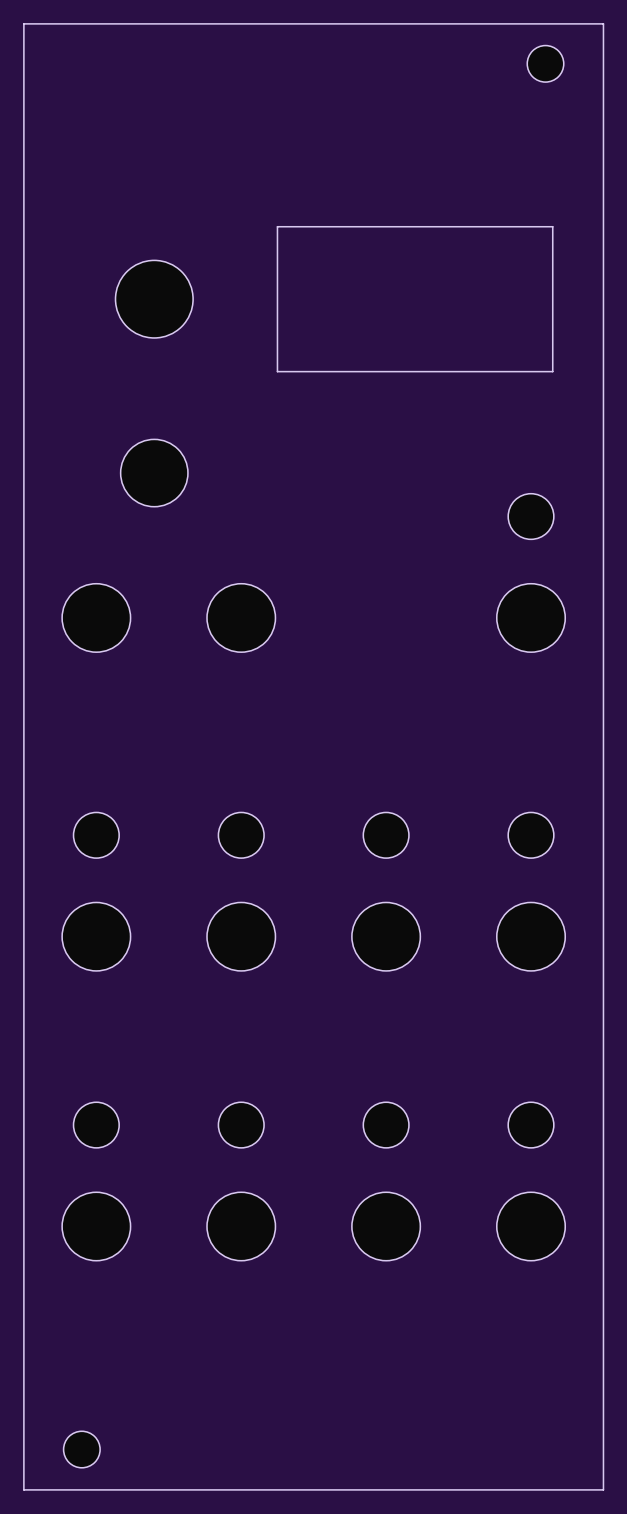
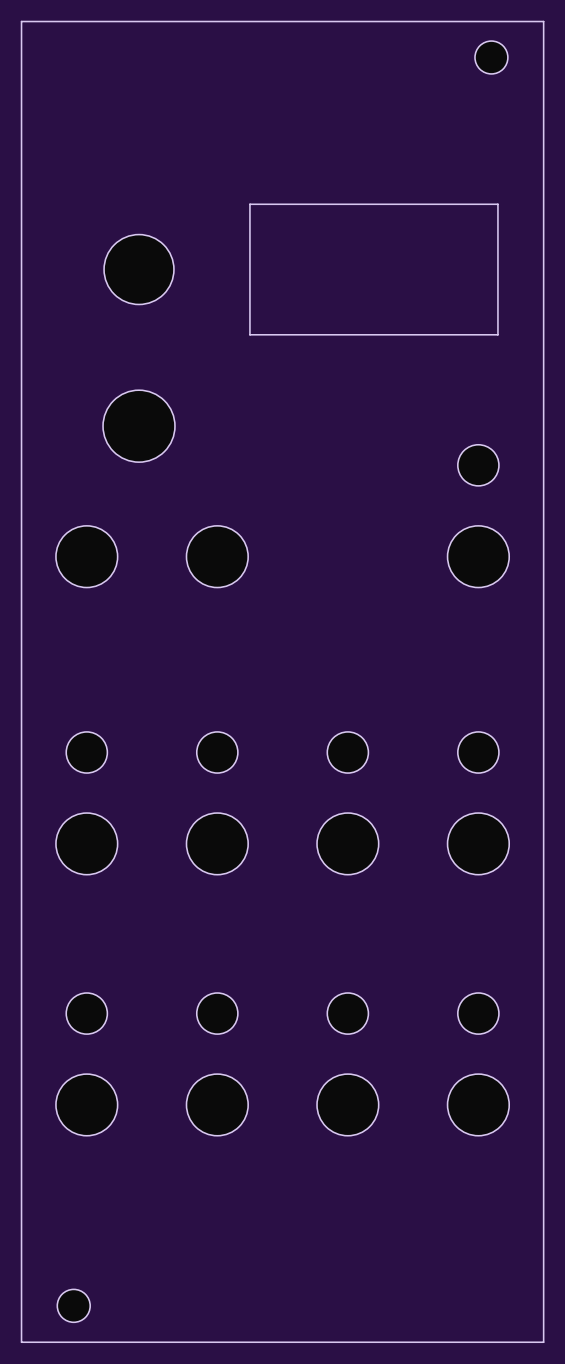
part footprint: [120, 439, 188, 507] -> [103, 390, 175, 463]

